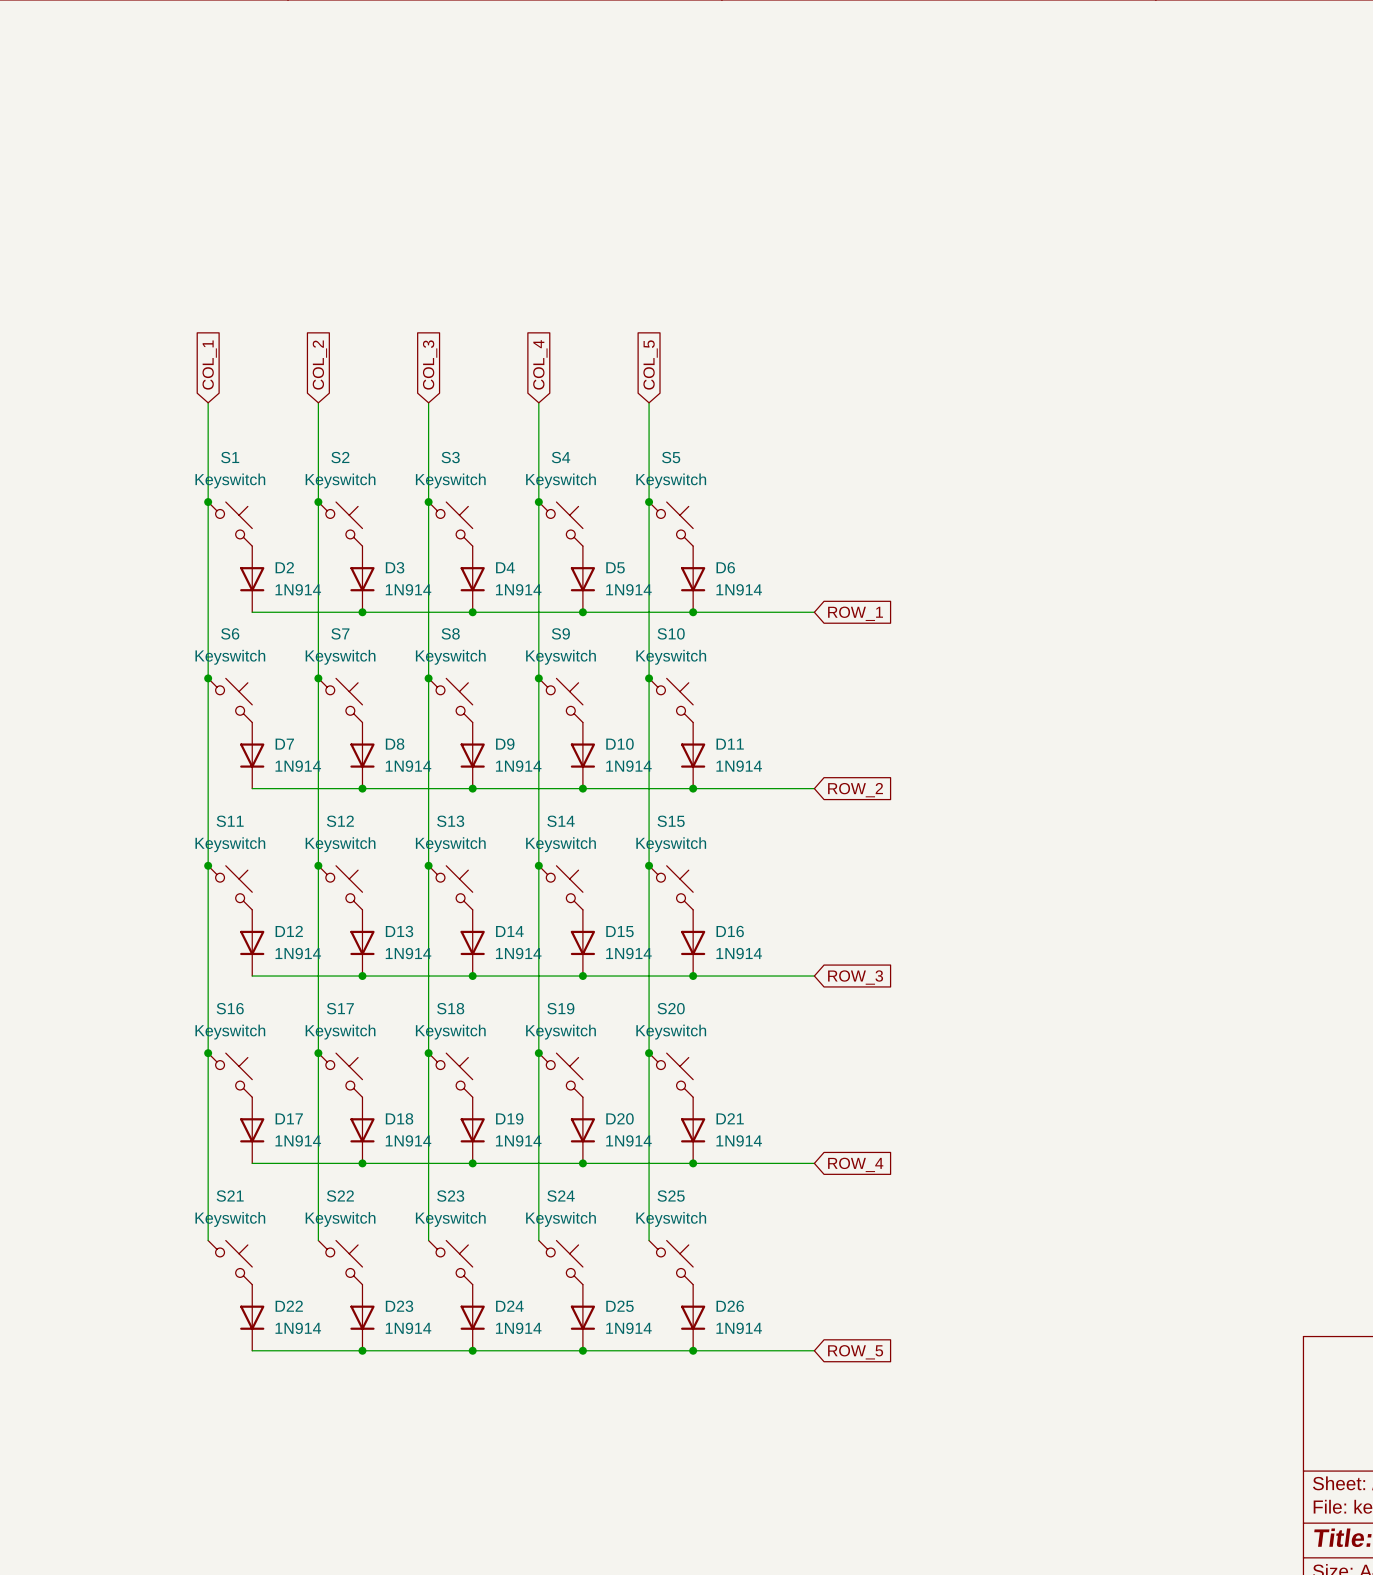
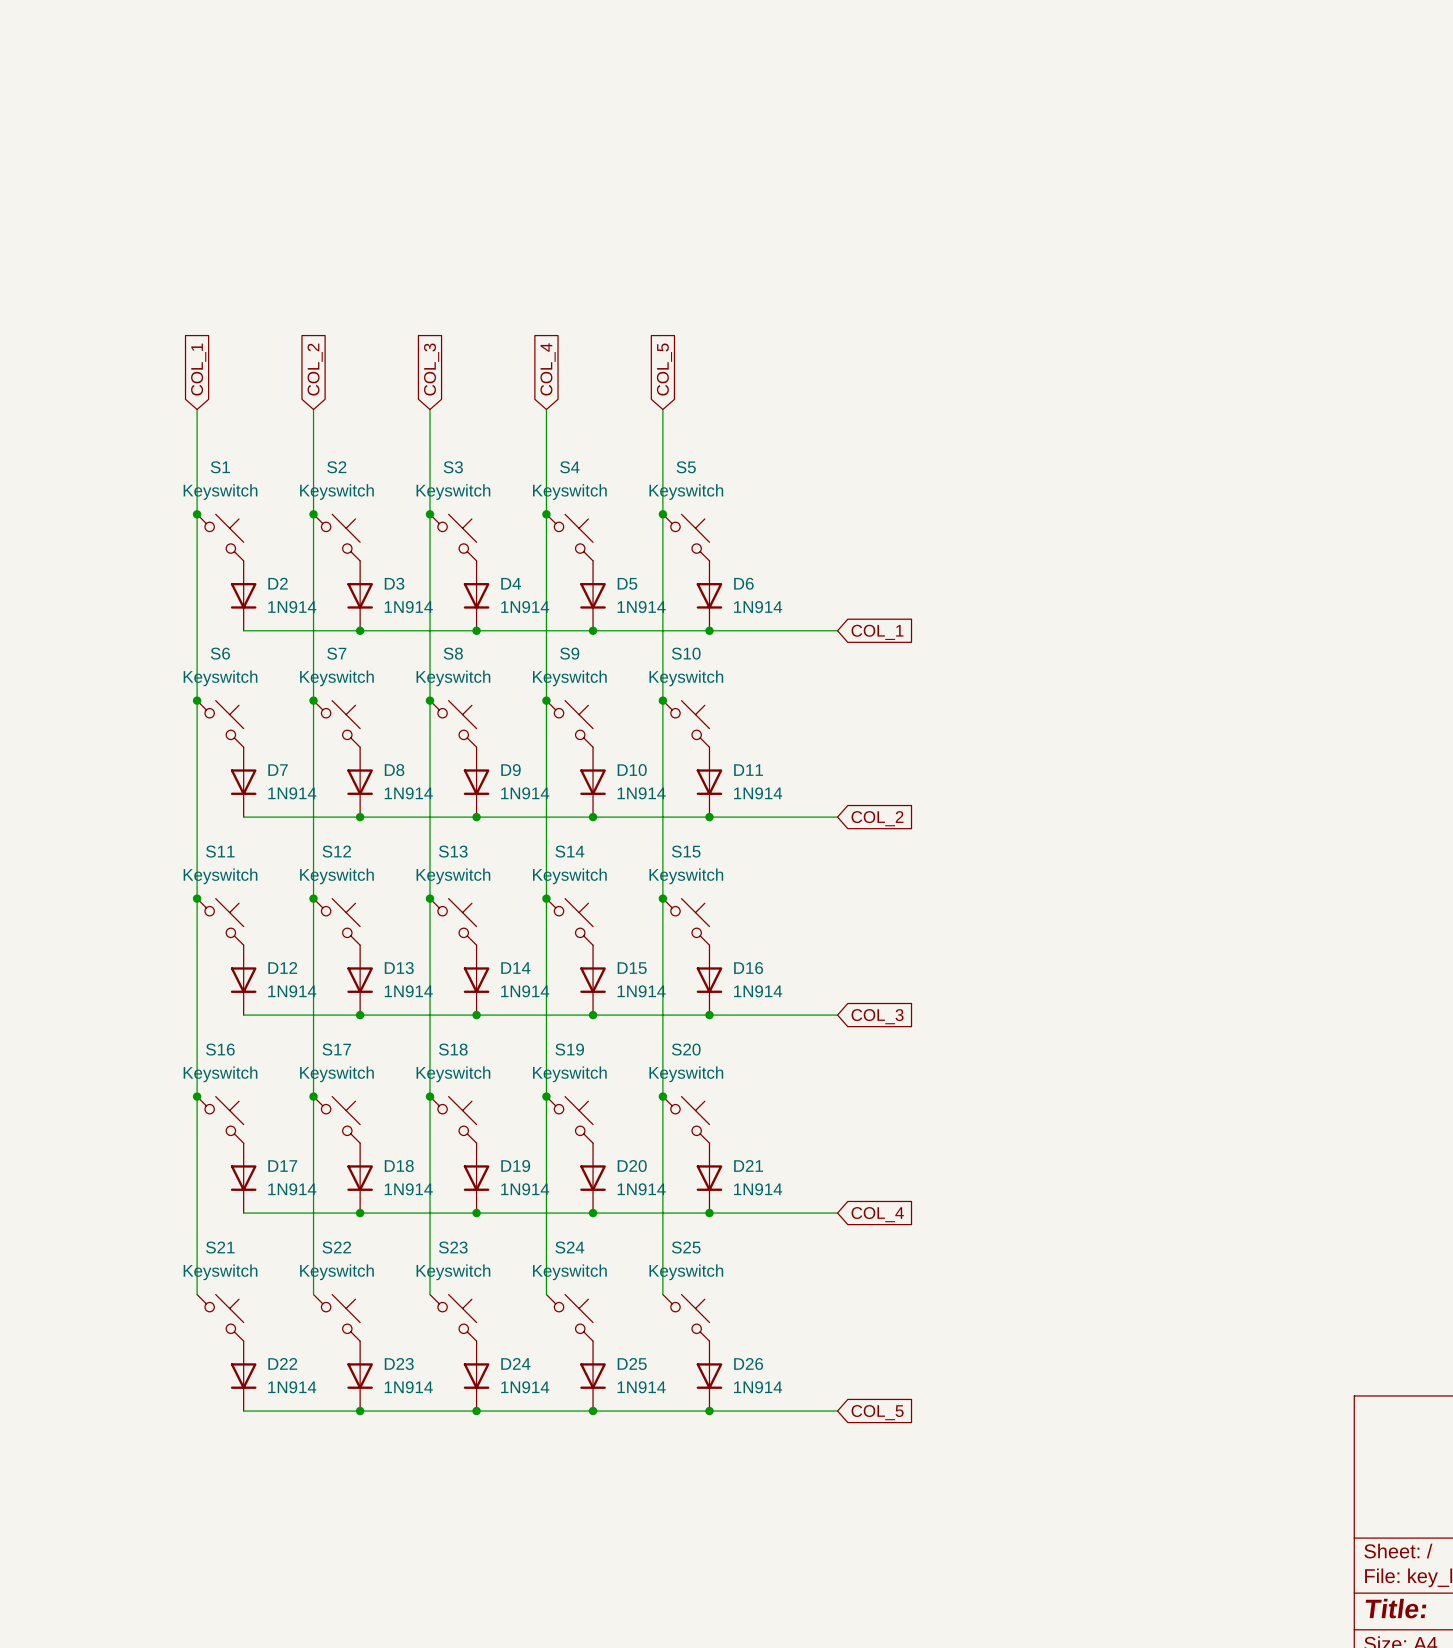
global label: ROW_1 (855, 613) -> COL_1 (877, 632)
global label: ROW_2 (855, 790) -> COL_2 (877, 818)
global label: ROW_3 (855, 977) -> COL_3 (877, 1016)
global label: ROW_4 (855, 1164) -> COL_4 (877, 1214)
global label: ROW_5 (855, 1352) -> COL_5 (877, 1412)

